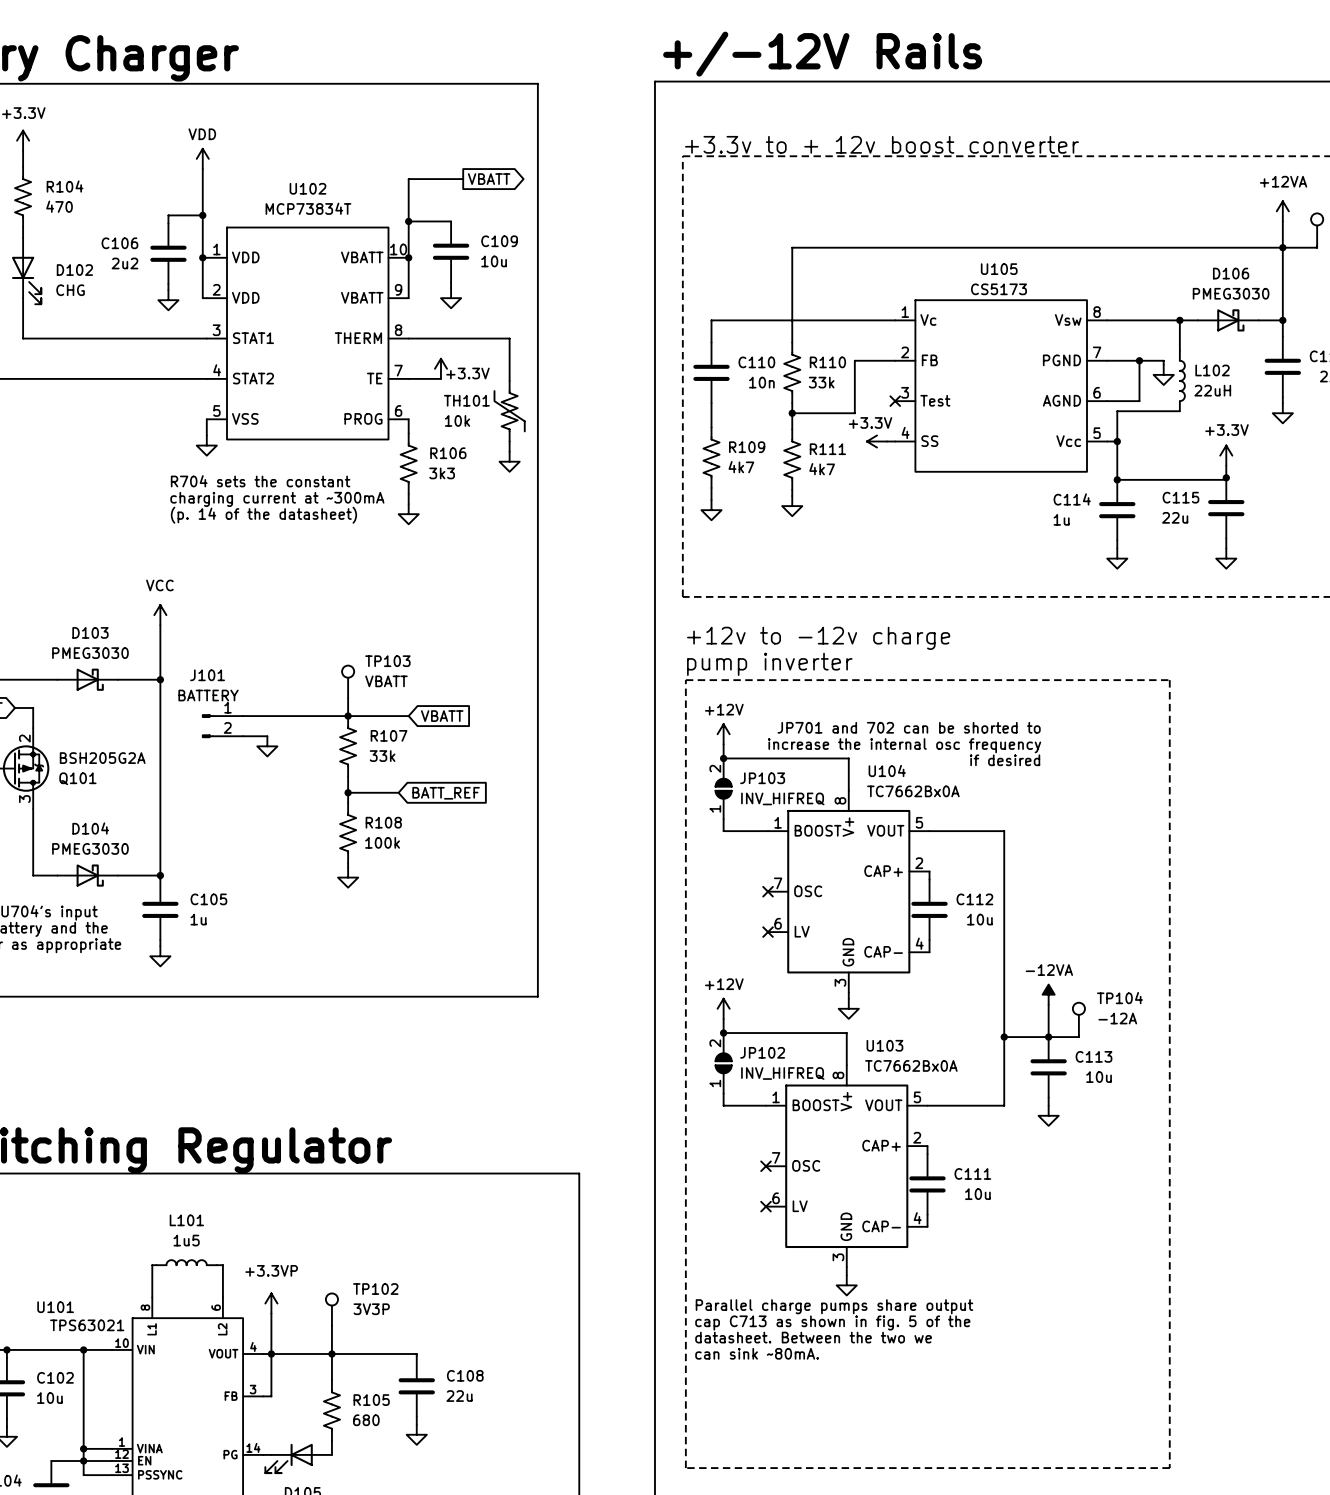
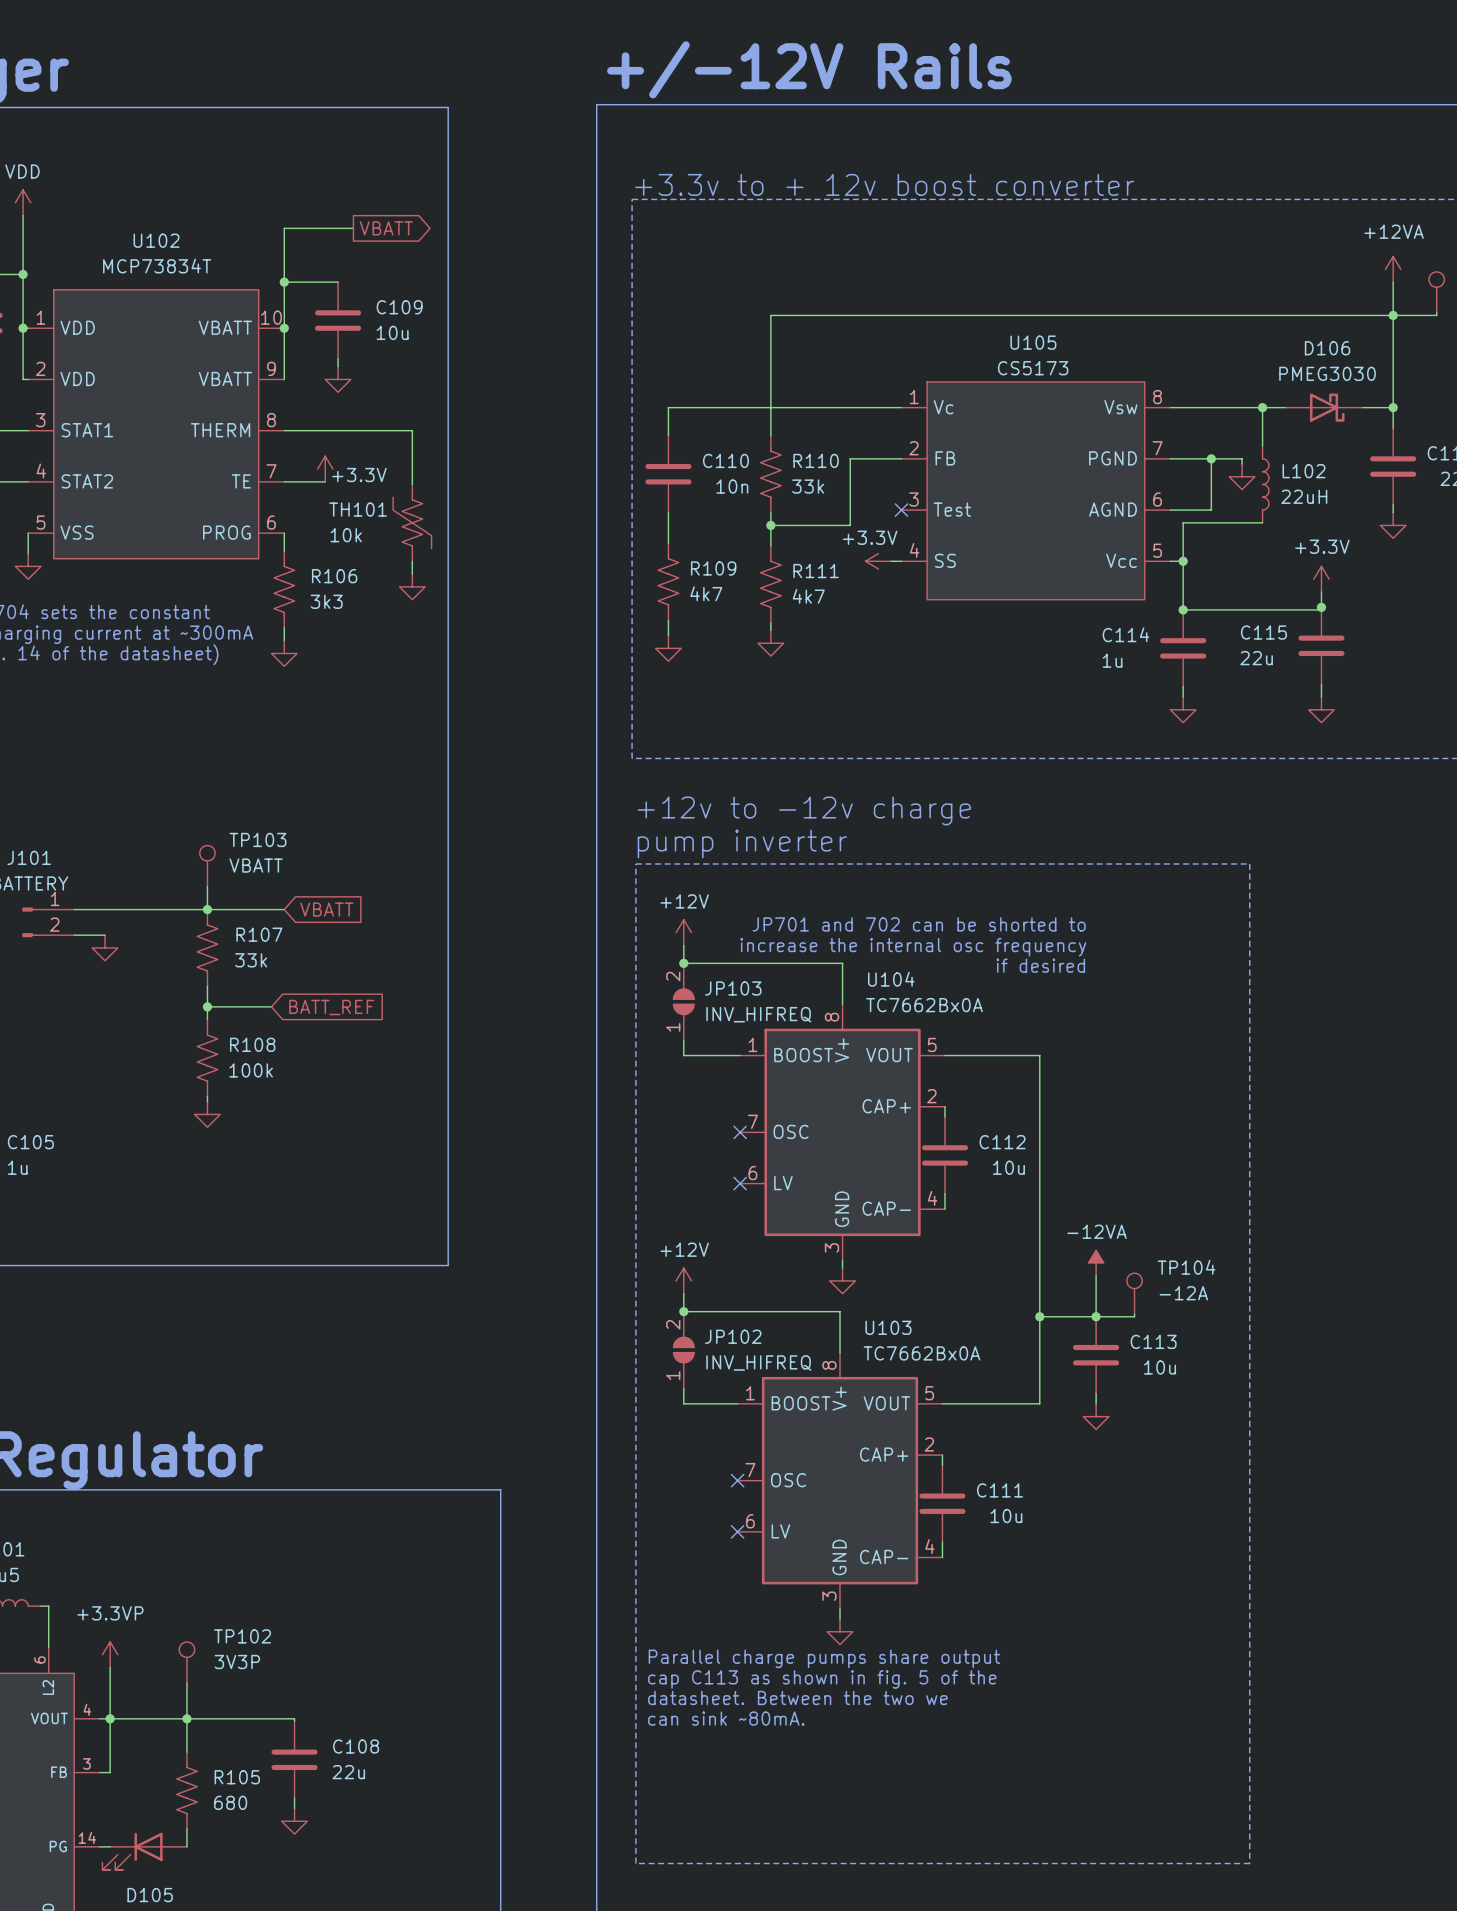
text: cap C713 as shown in fig. 5 of the (832, 1322) -> cap C113 as shown in fig. 5 of the (822, 1679)

